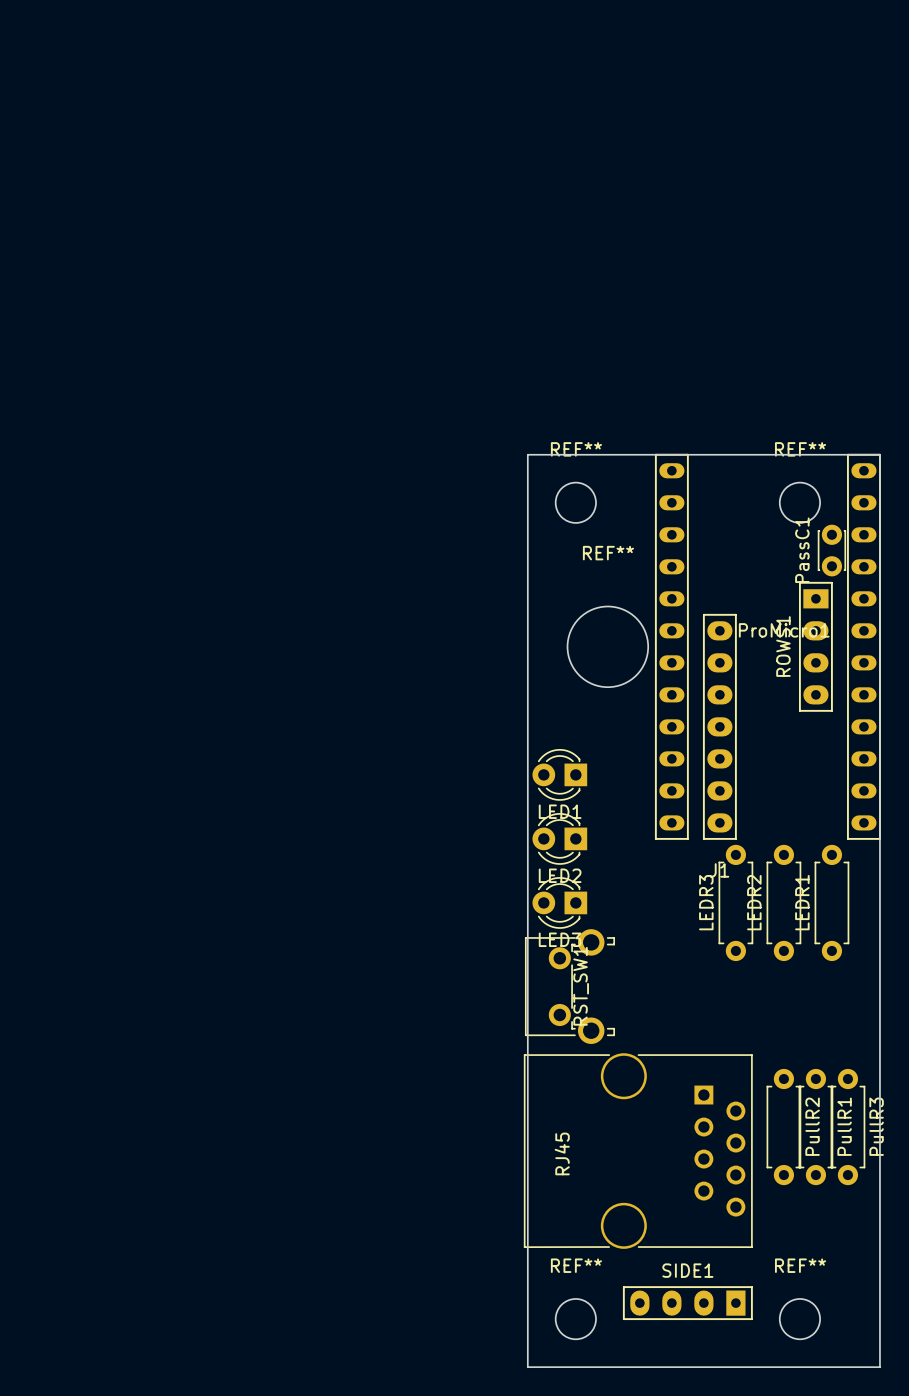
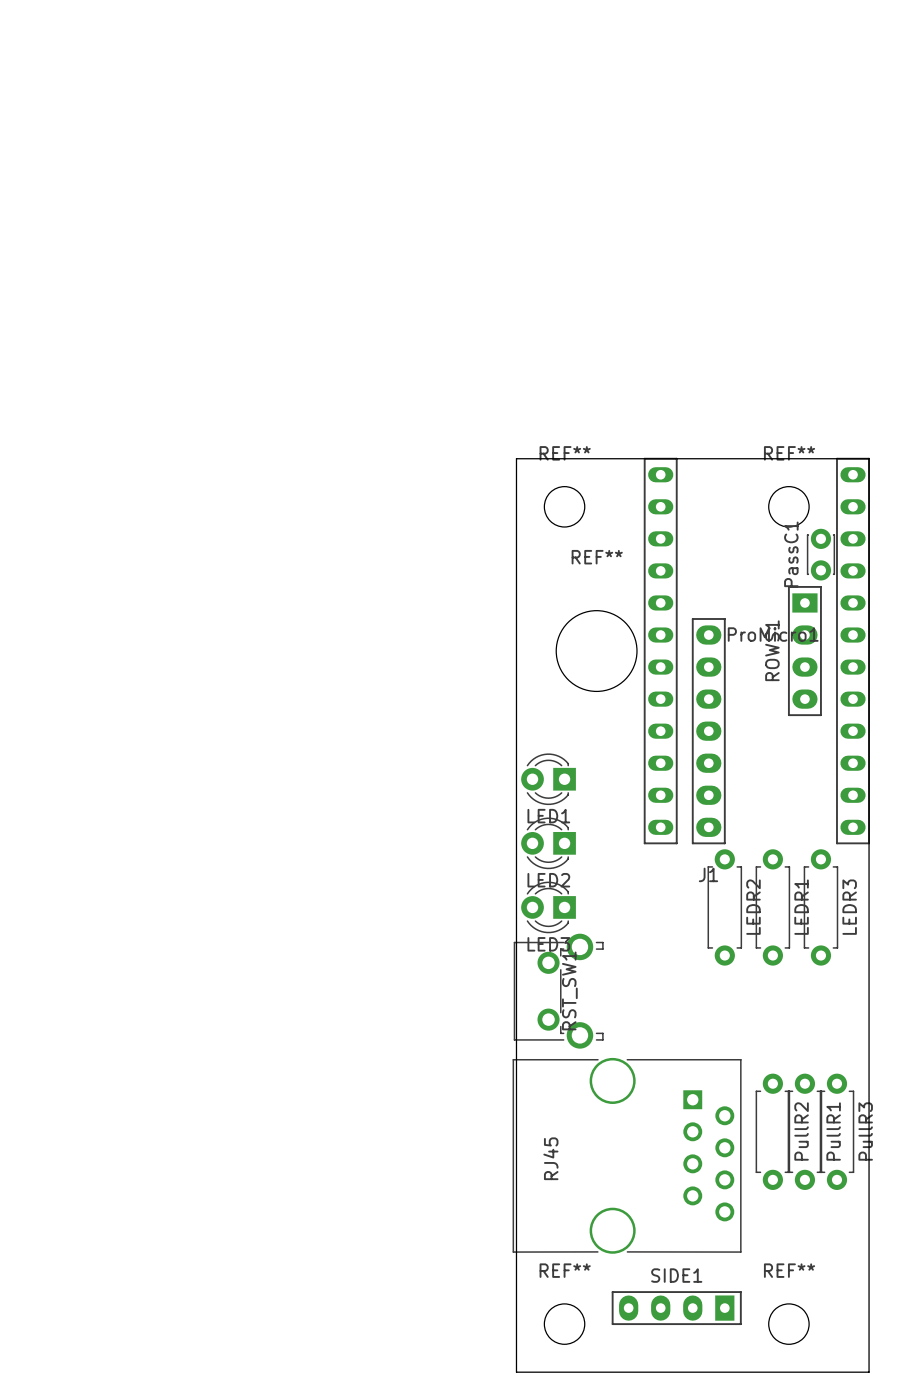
LEDR3 name: LEDR3 (706, 902) -> LEDR2 (753, 907)
LEDR2 name: LEDR2 (754, 902) -> LEDR1 (801, 907)
LEDR1 name: LEDR1 (802, 902) -> LEDR3 (849, 907)

